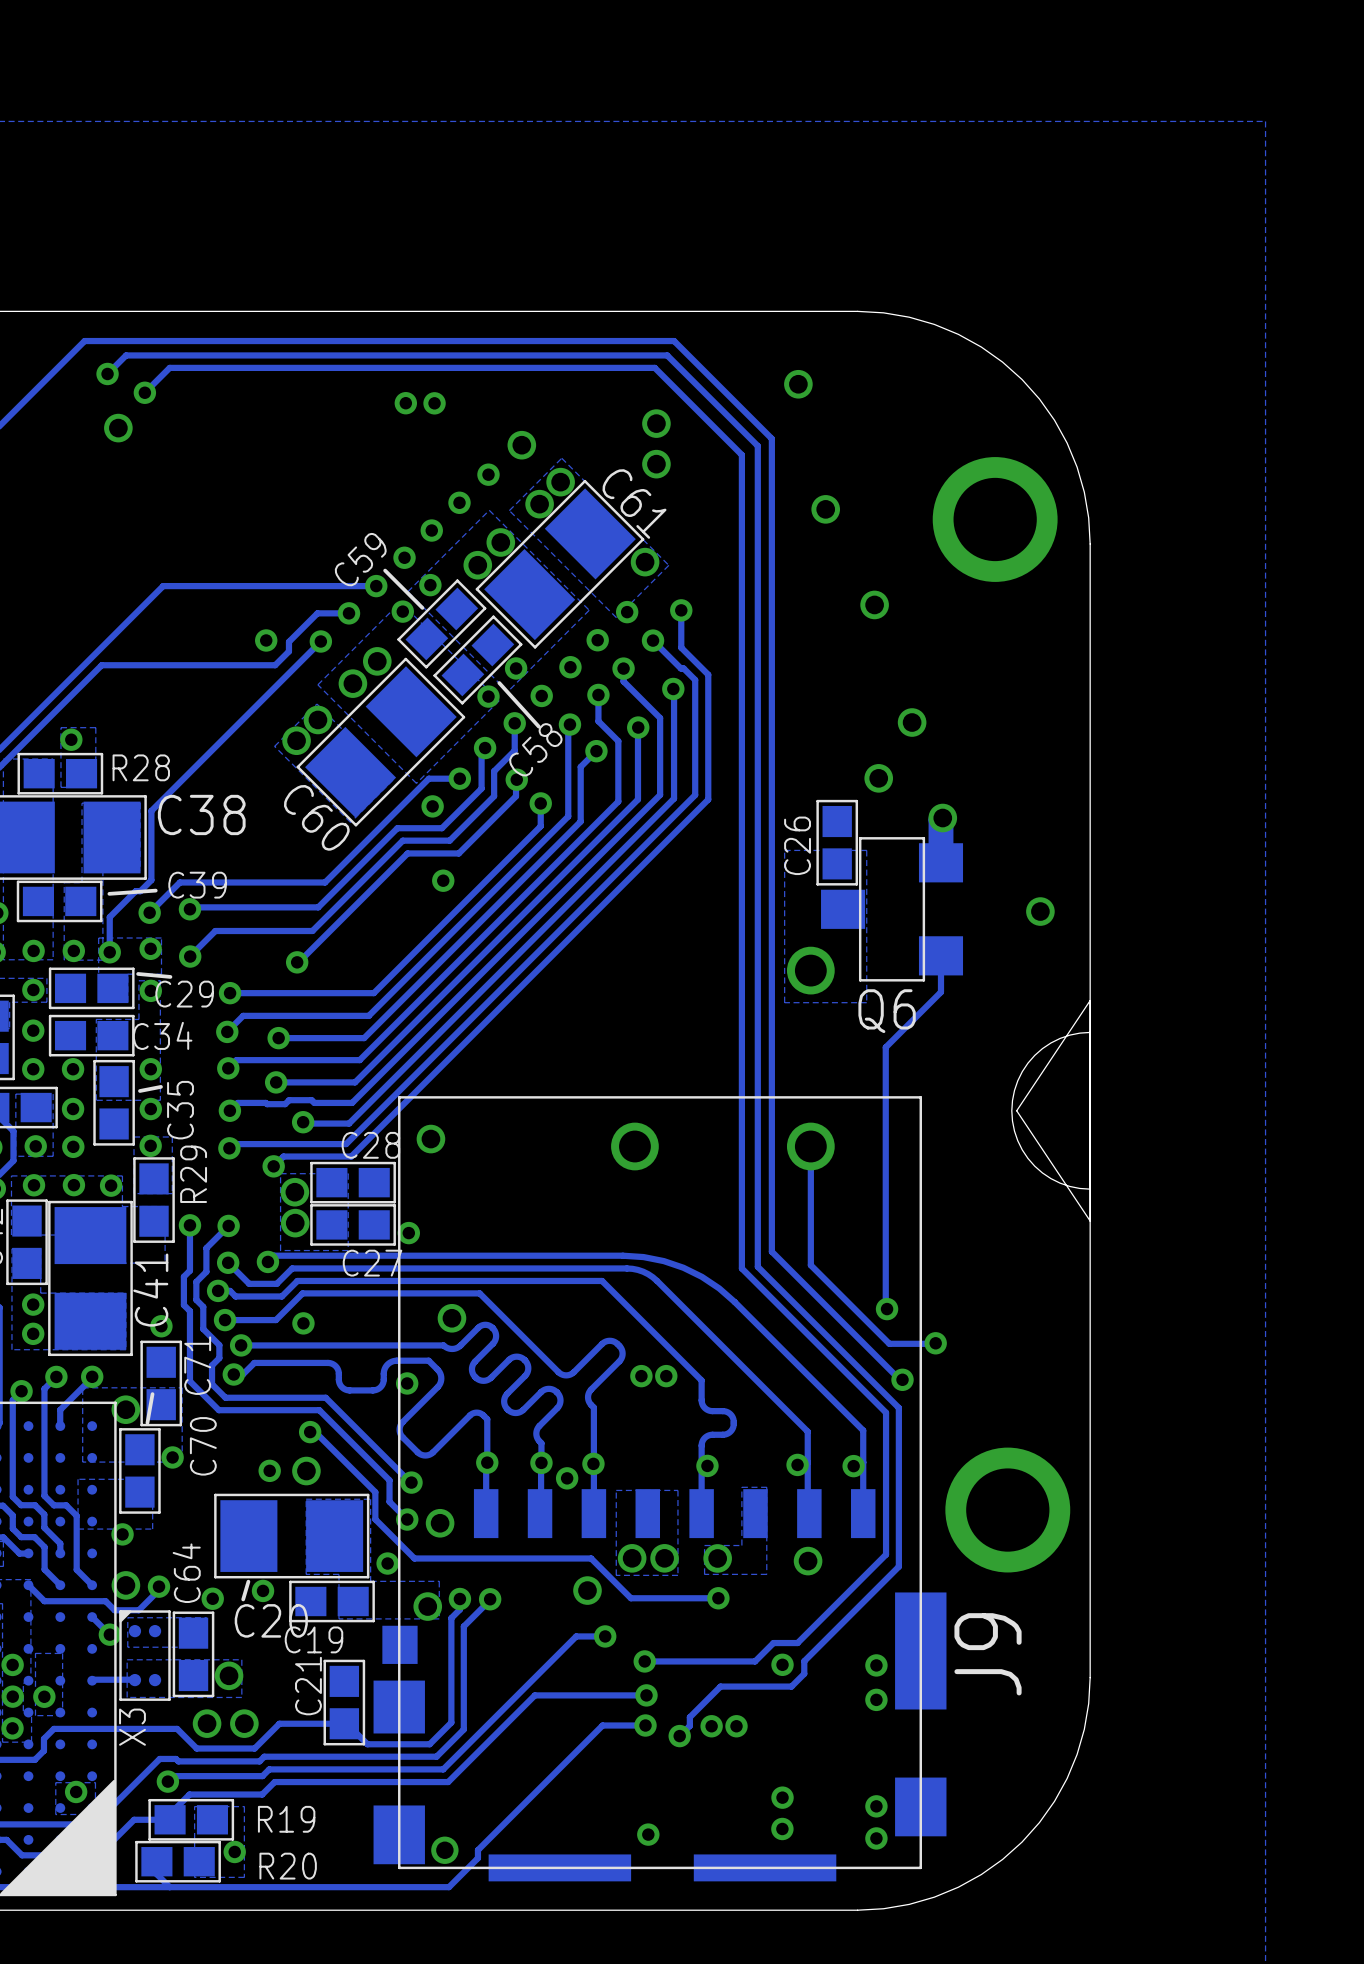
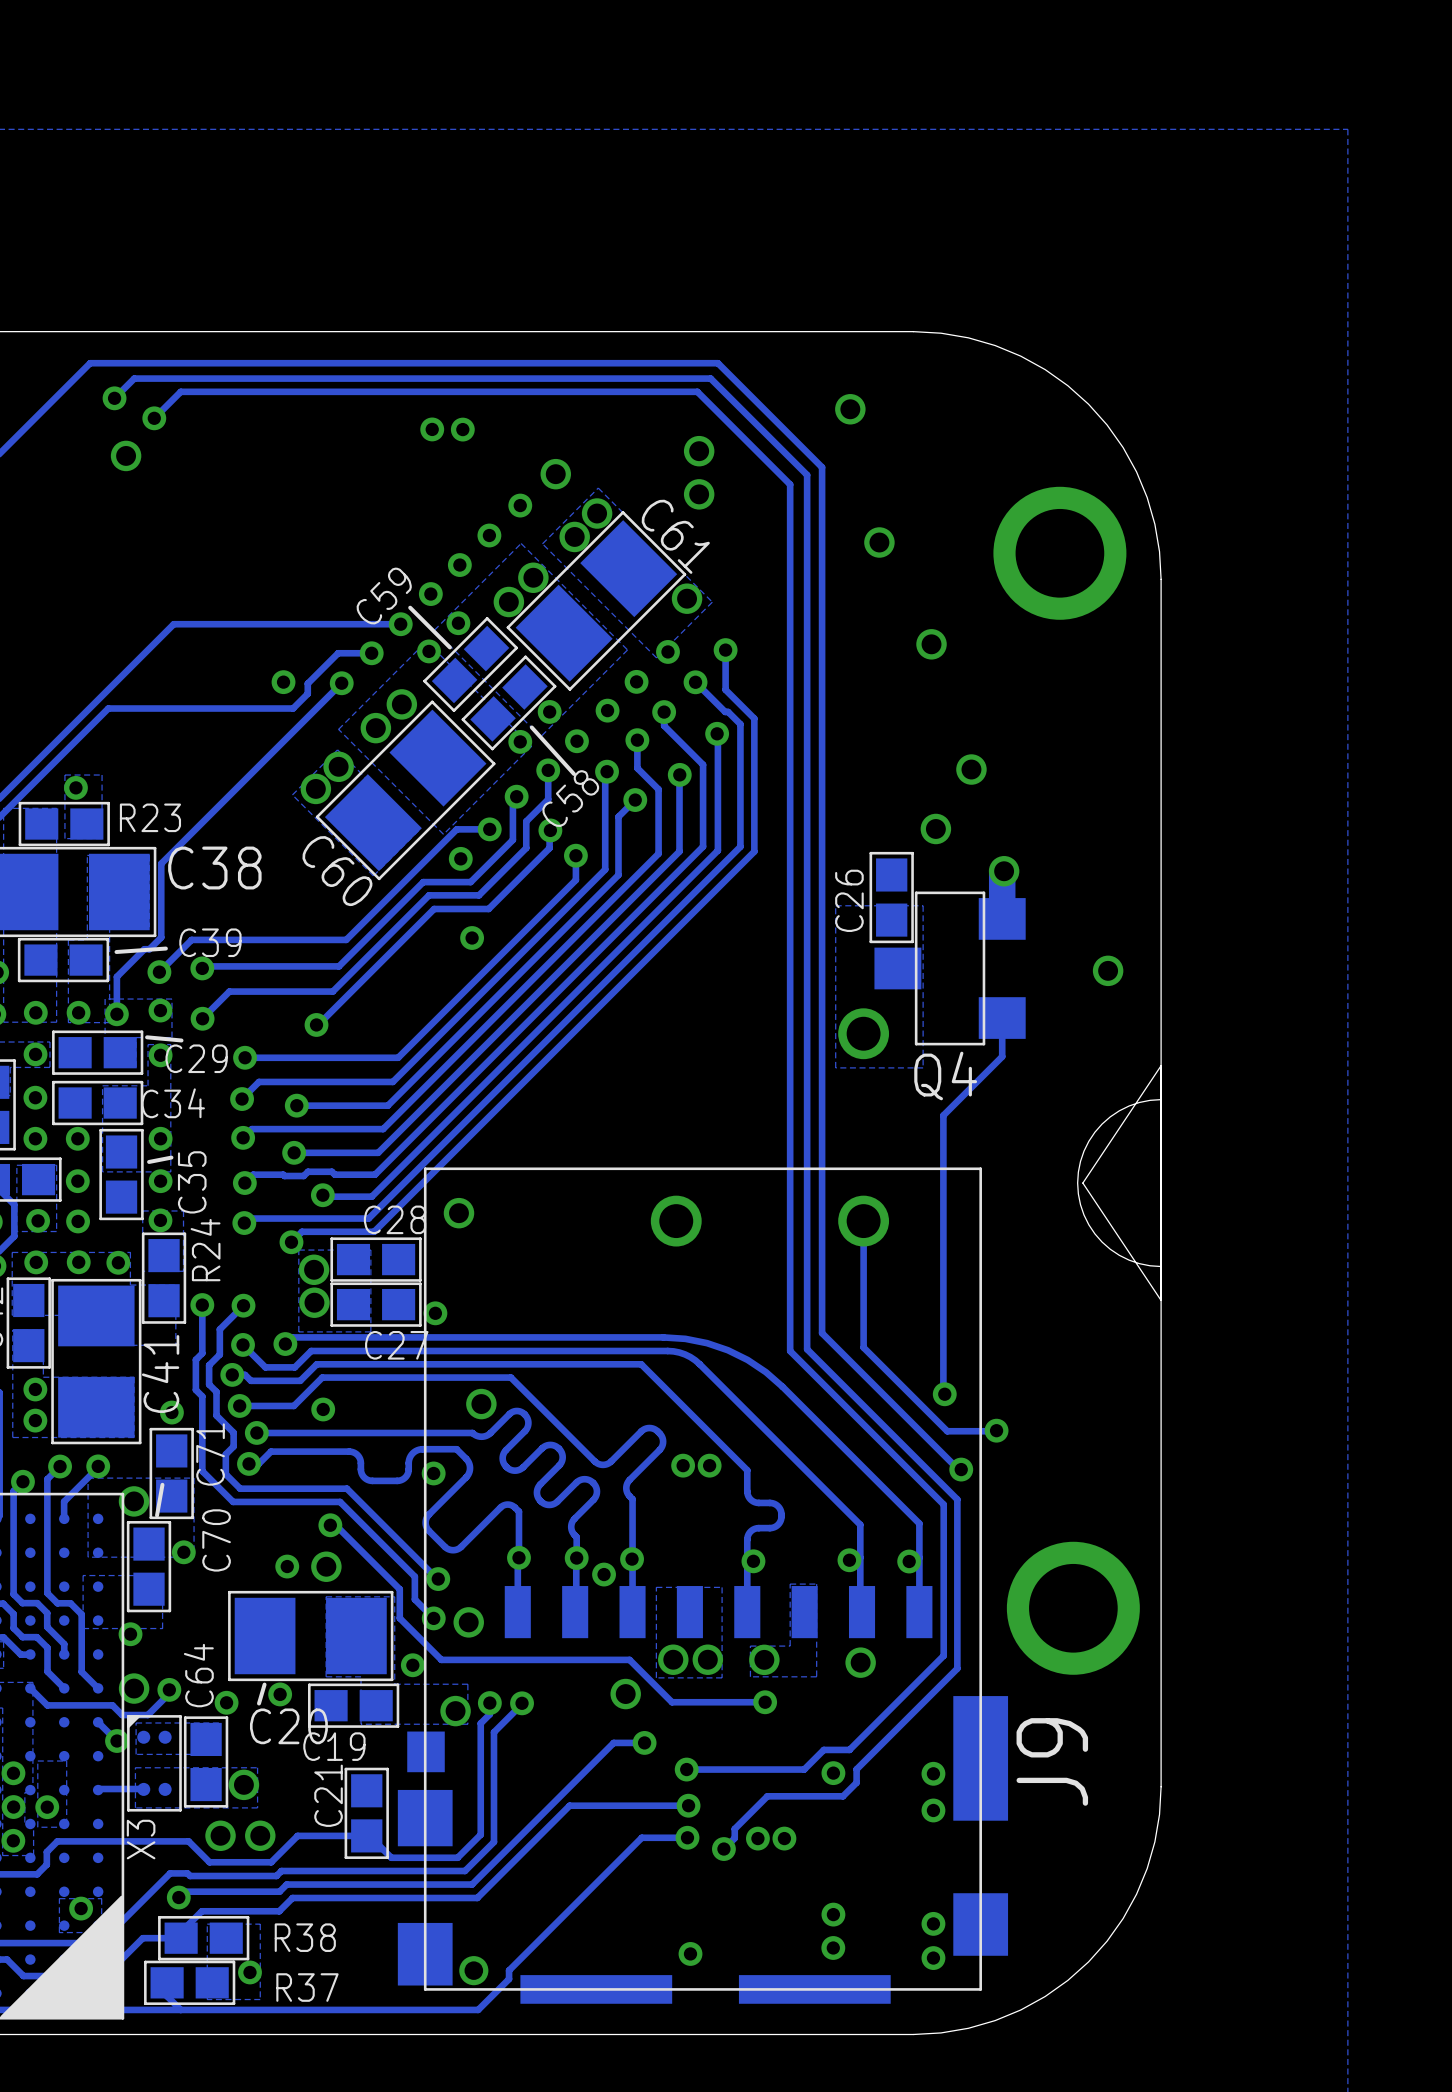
R28 name: R28 (141, 767) -> R23 (150, 817)
Q6 name: Q6 (887, 1011) -> Q4 (945, 1075)
R29 name: R29 (193, 1174) -> R24 (205, 1250)
R19 name: R19 (286, 1819) -> R38 (305, 1937)
R20 name: R20 (288, 1866) -> R37 (307, 1987)

